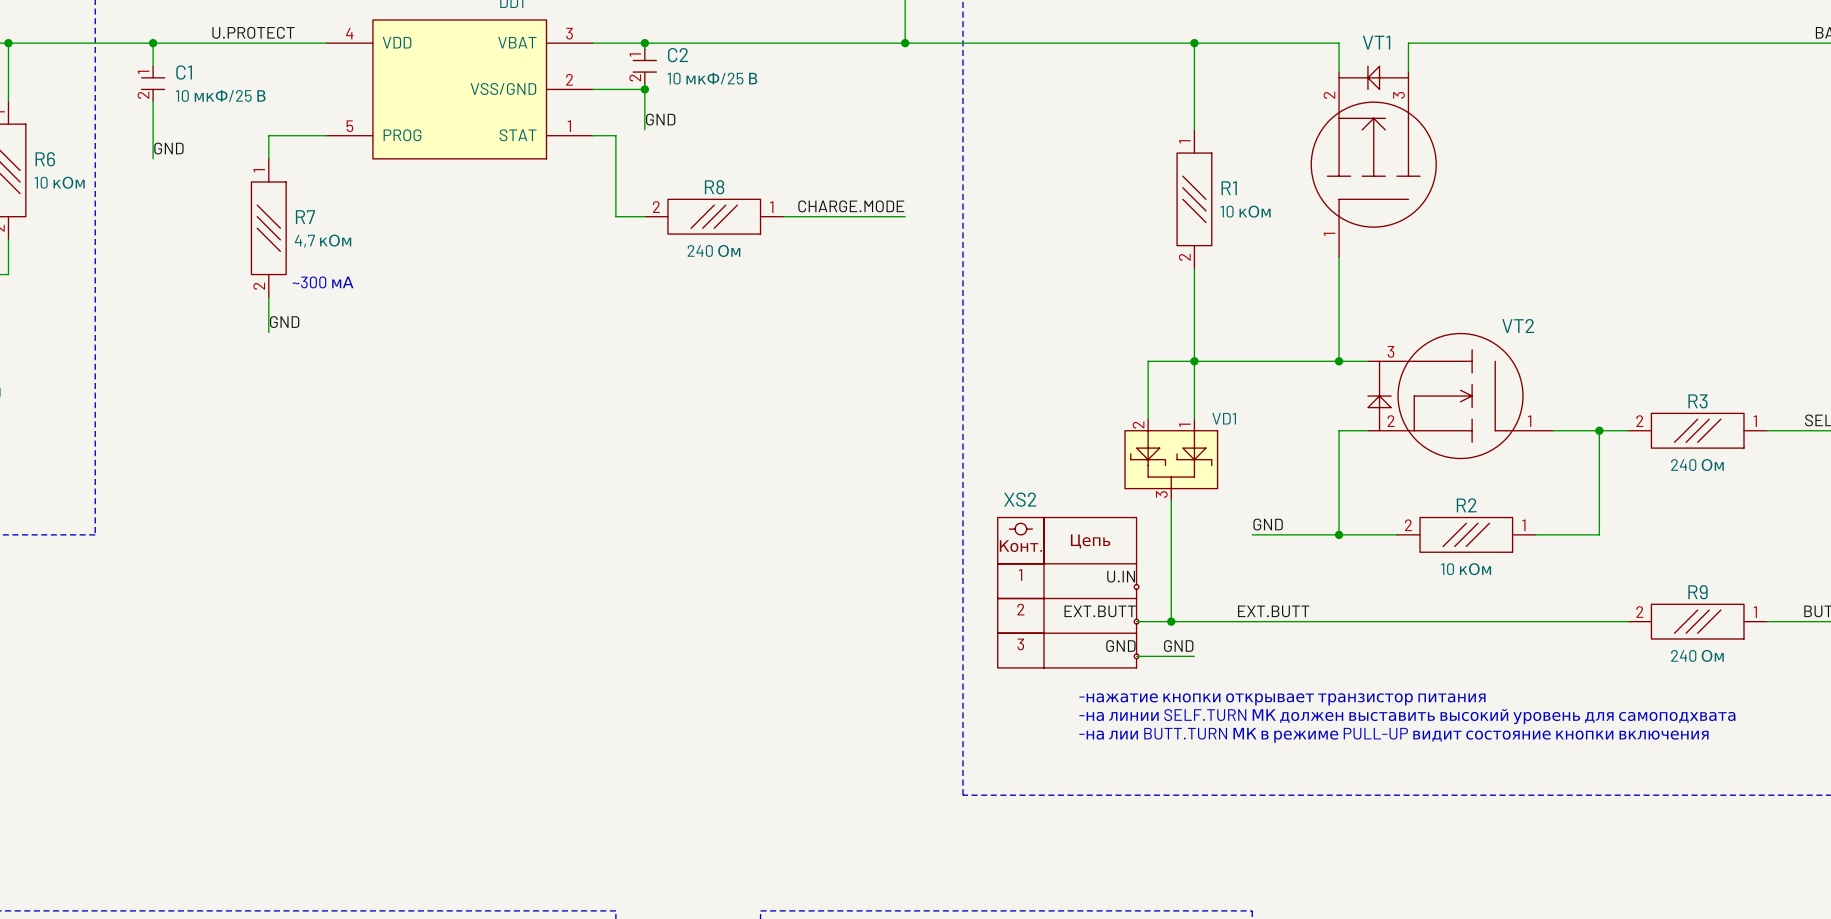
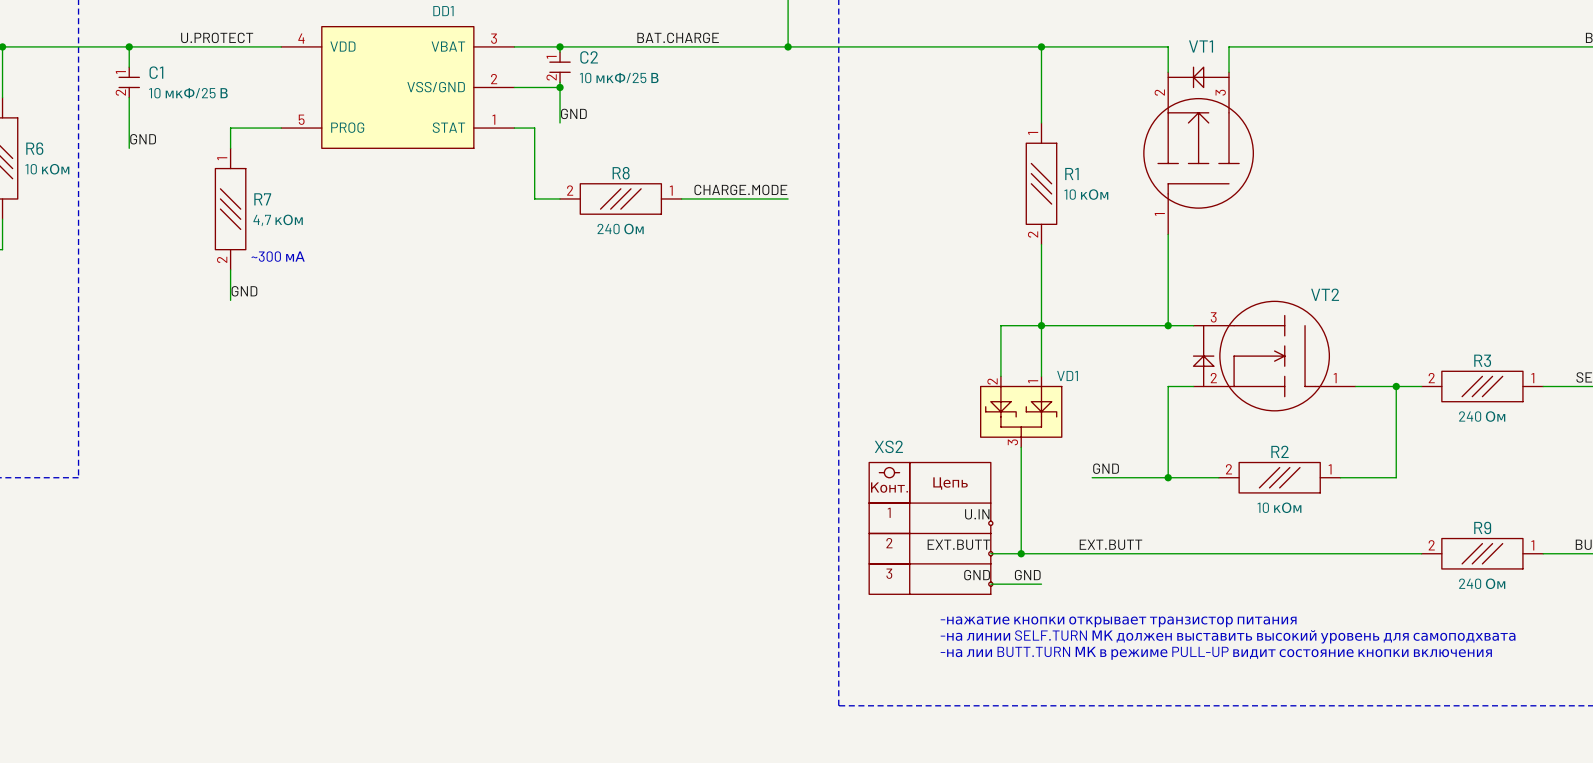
label: none -> BAT.CHARGE (678, 37)

